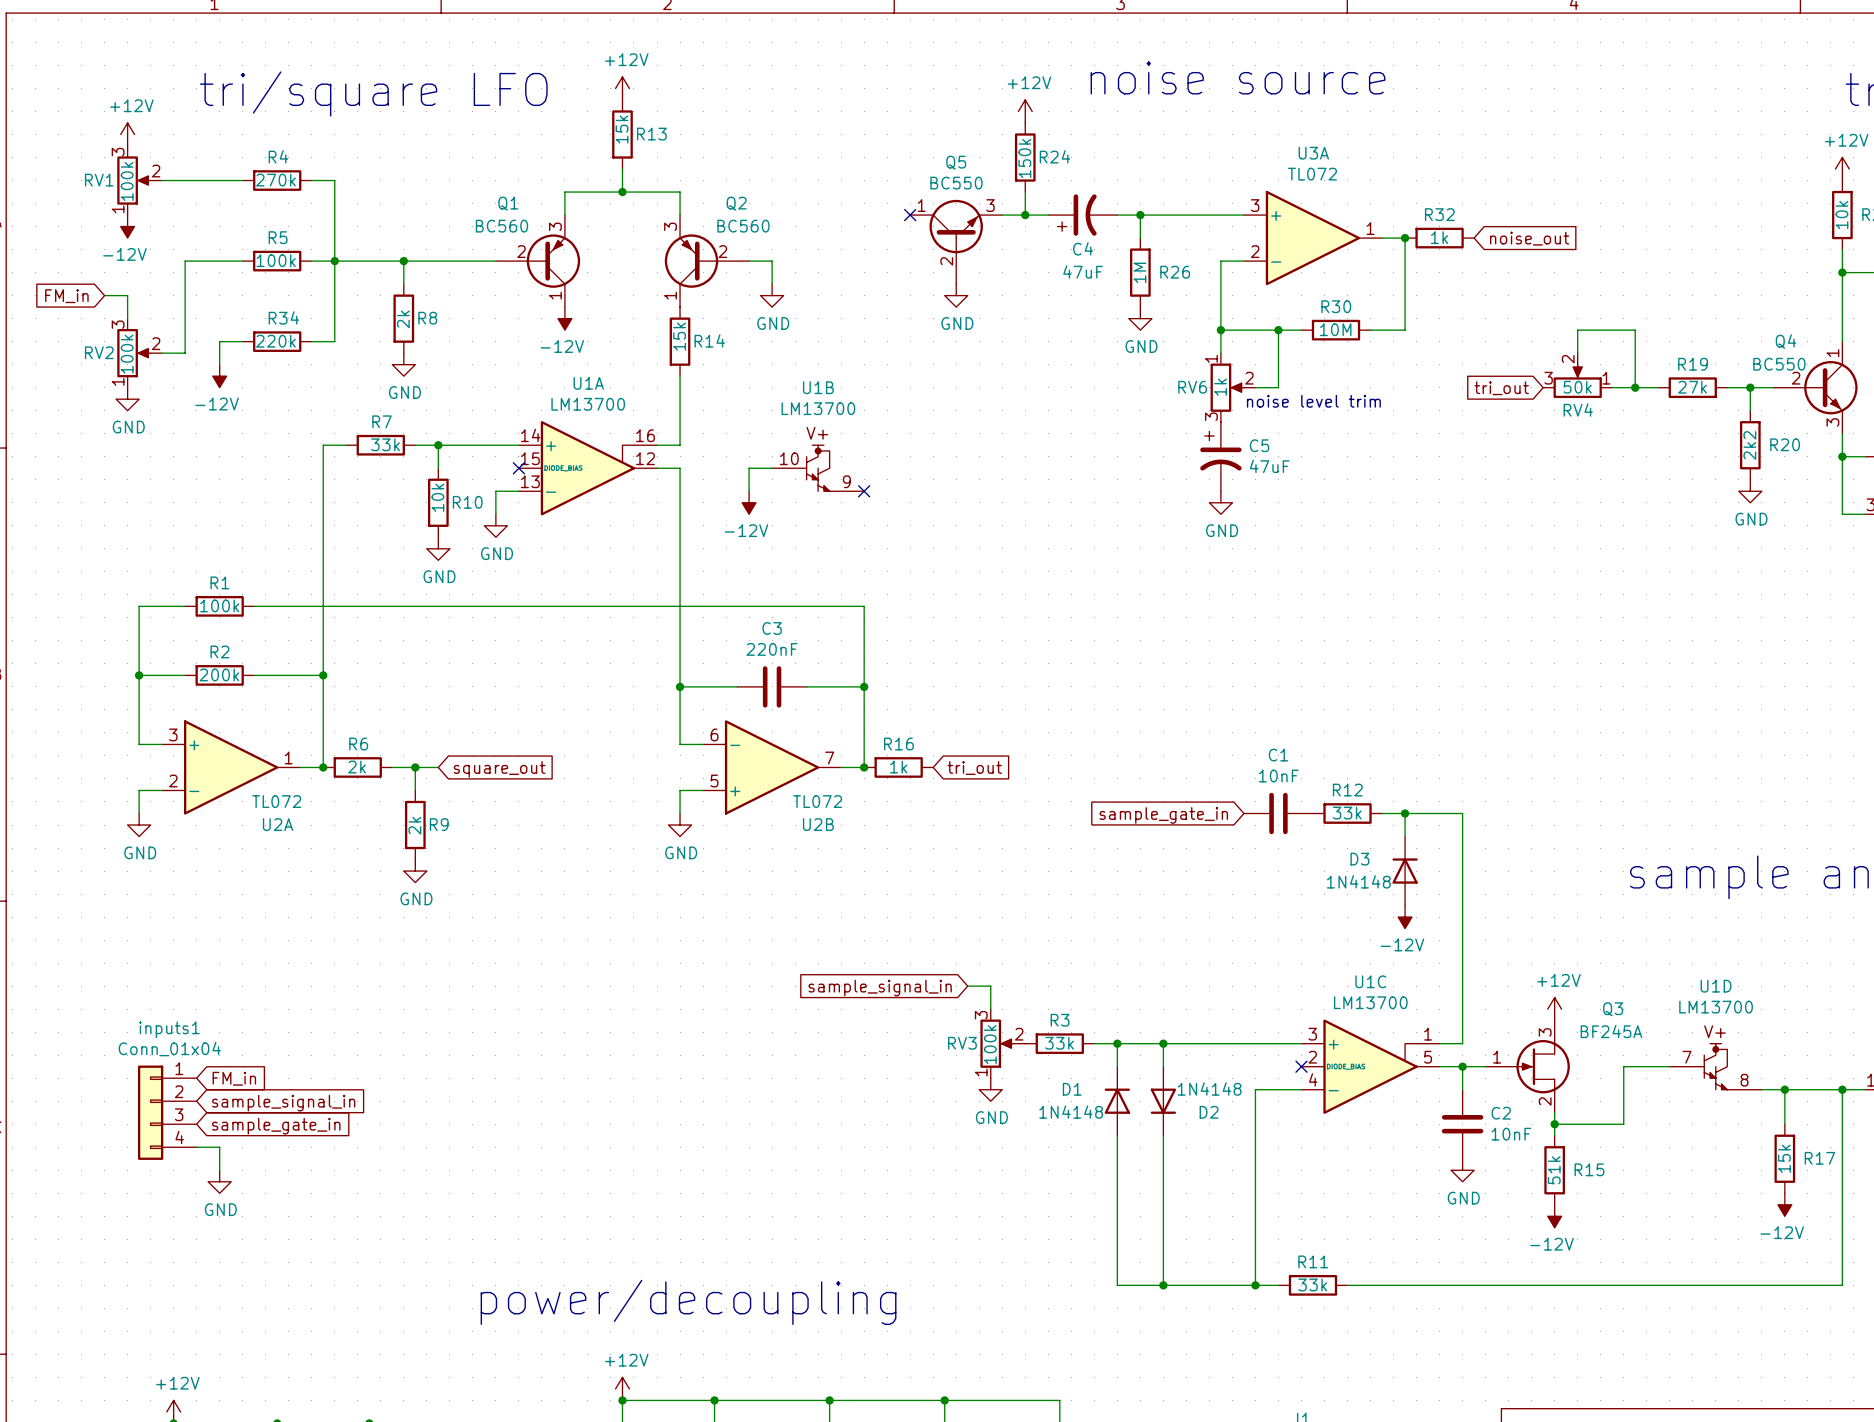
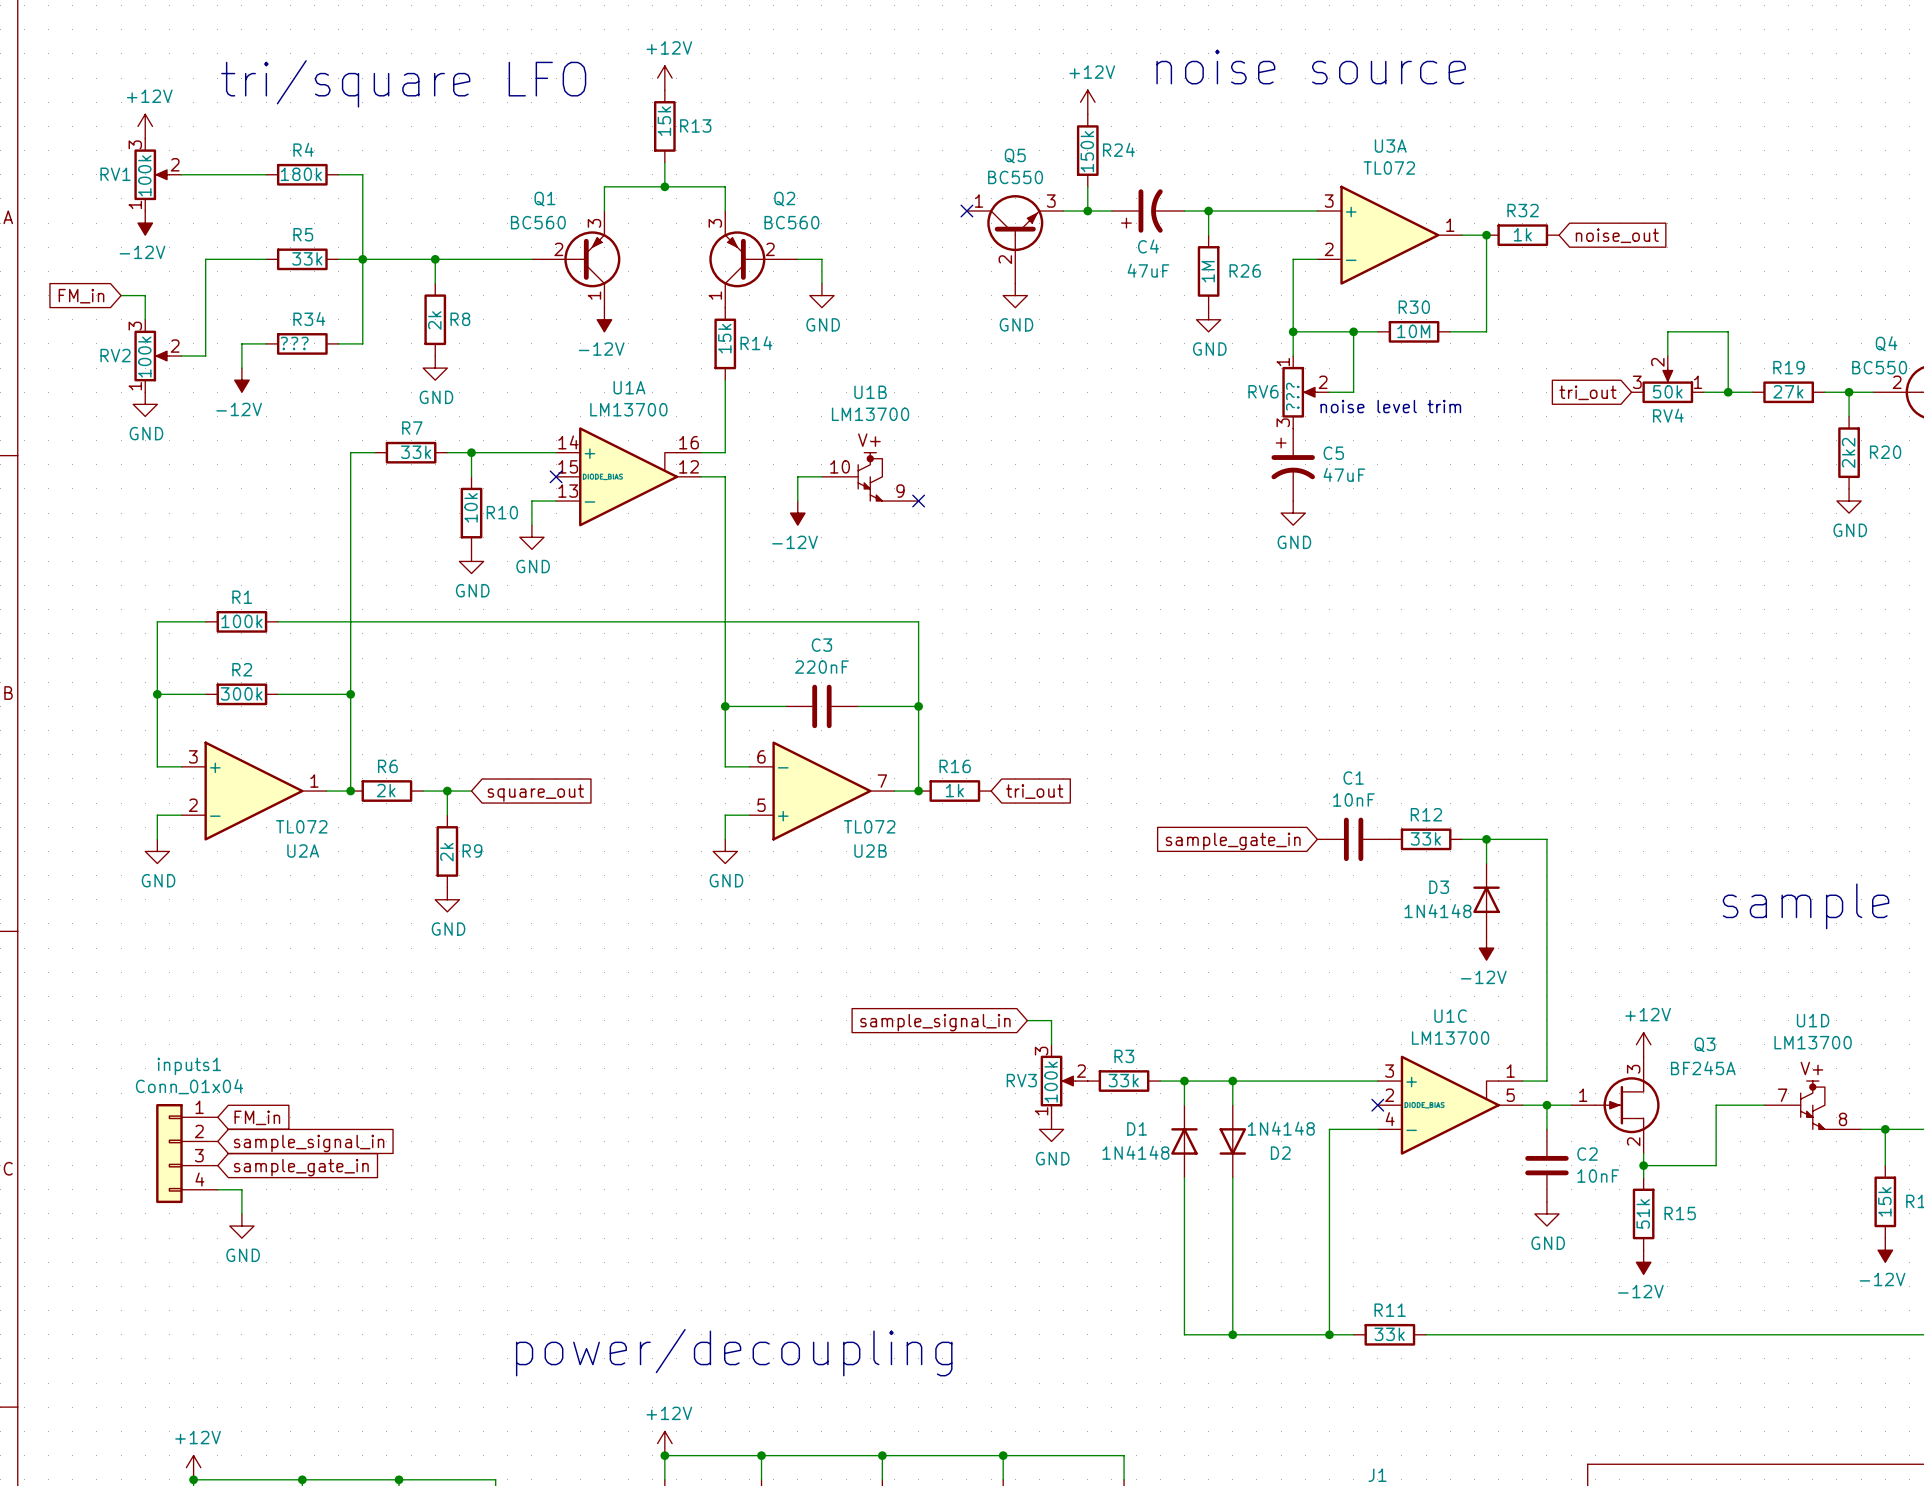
R4 value: 270k (275, 180) -> 180k (301, 174)
R5 value: 100k (276, 260) -> 33k (307, 258)
R34 value: 220k (275, 341) -> ??? (294, 343)
RV6 value: 1k (1220, 387) -> ??? (1292, 396)
R2 value: 200k (219, 674) -> 300k (241, 693)

